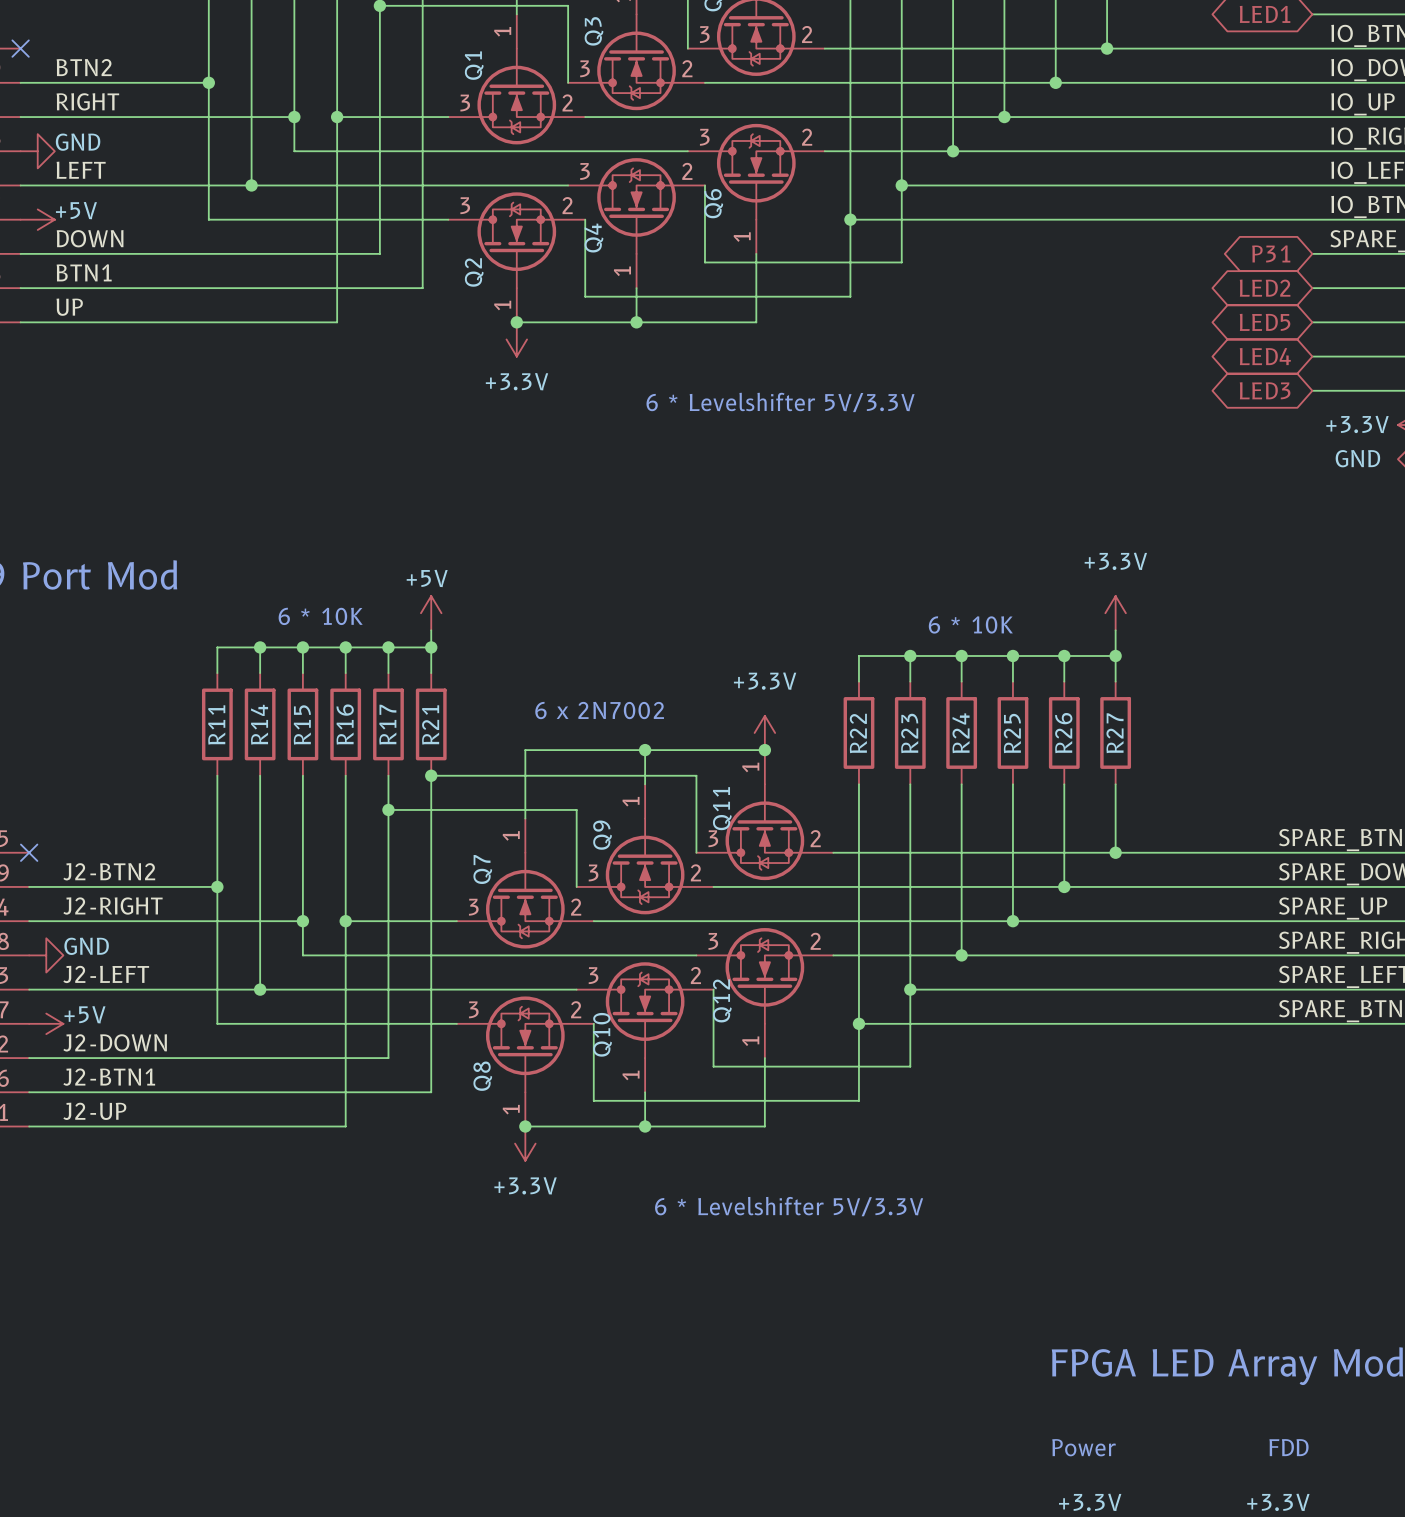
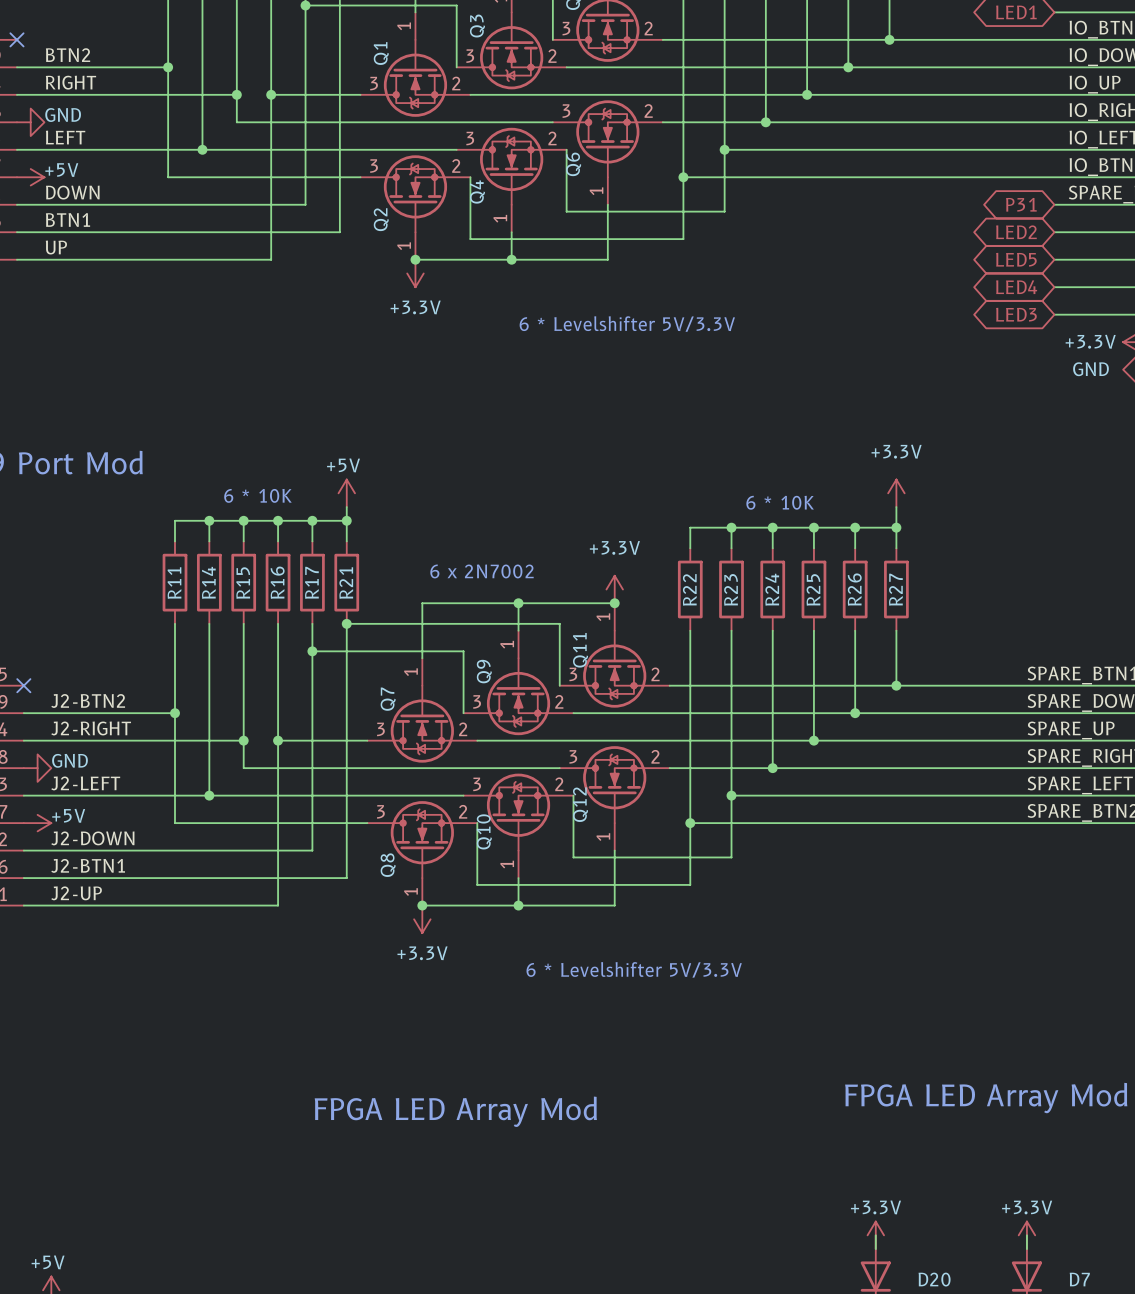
text: none -> FPGA LED Array Mod (455, 1111)
text: Power (1083, 1447) -> none
text: FDD (1288, 1447) -> none

